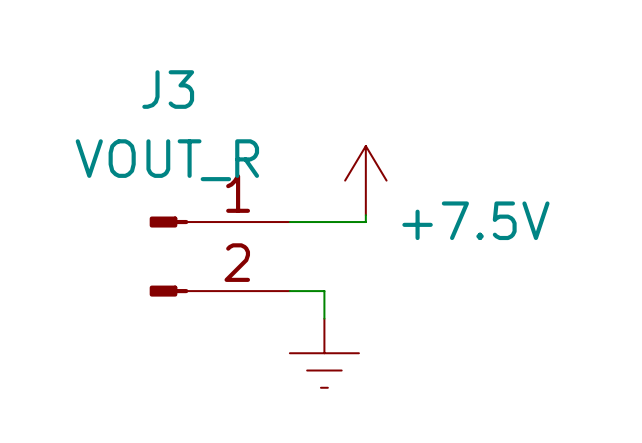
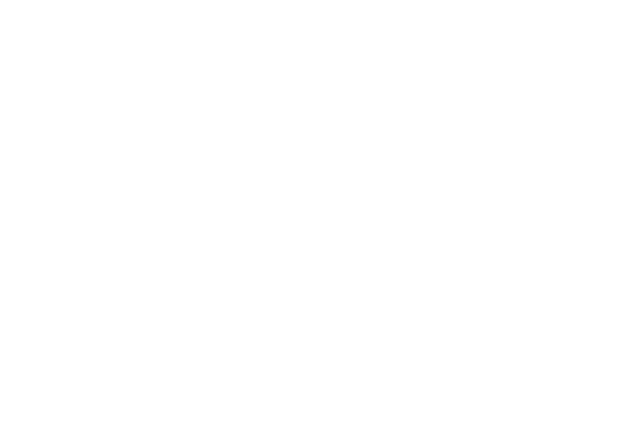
power symbol: +7.5V (365, 180) -> none
wire: (365, 215) (365, 222) (289, 222) -> none
J3: VOUT_R (219, 256) -> none
wire: (289, 291) (324, 291) (324, 318) -> none
power symbol: (324, 353) -> none

